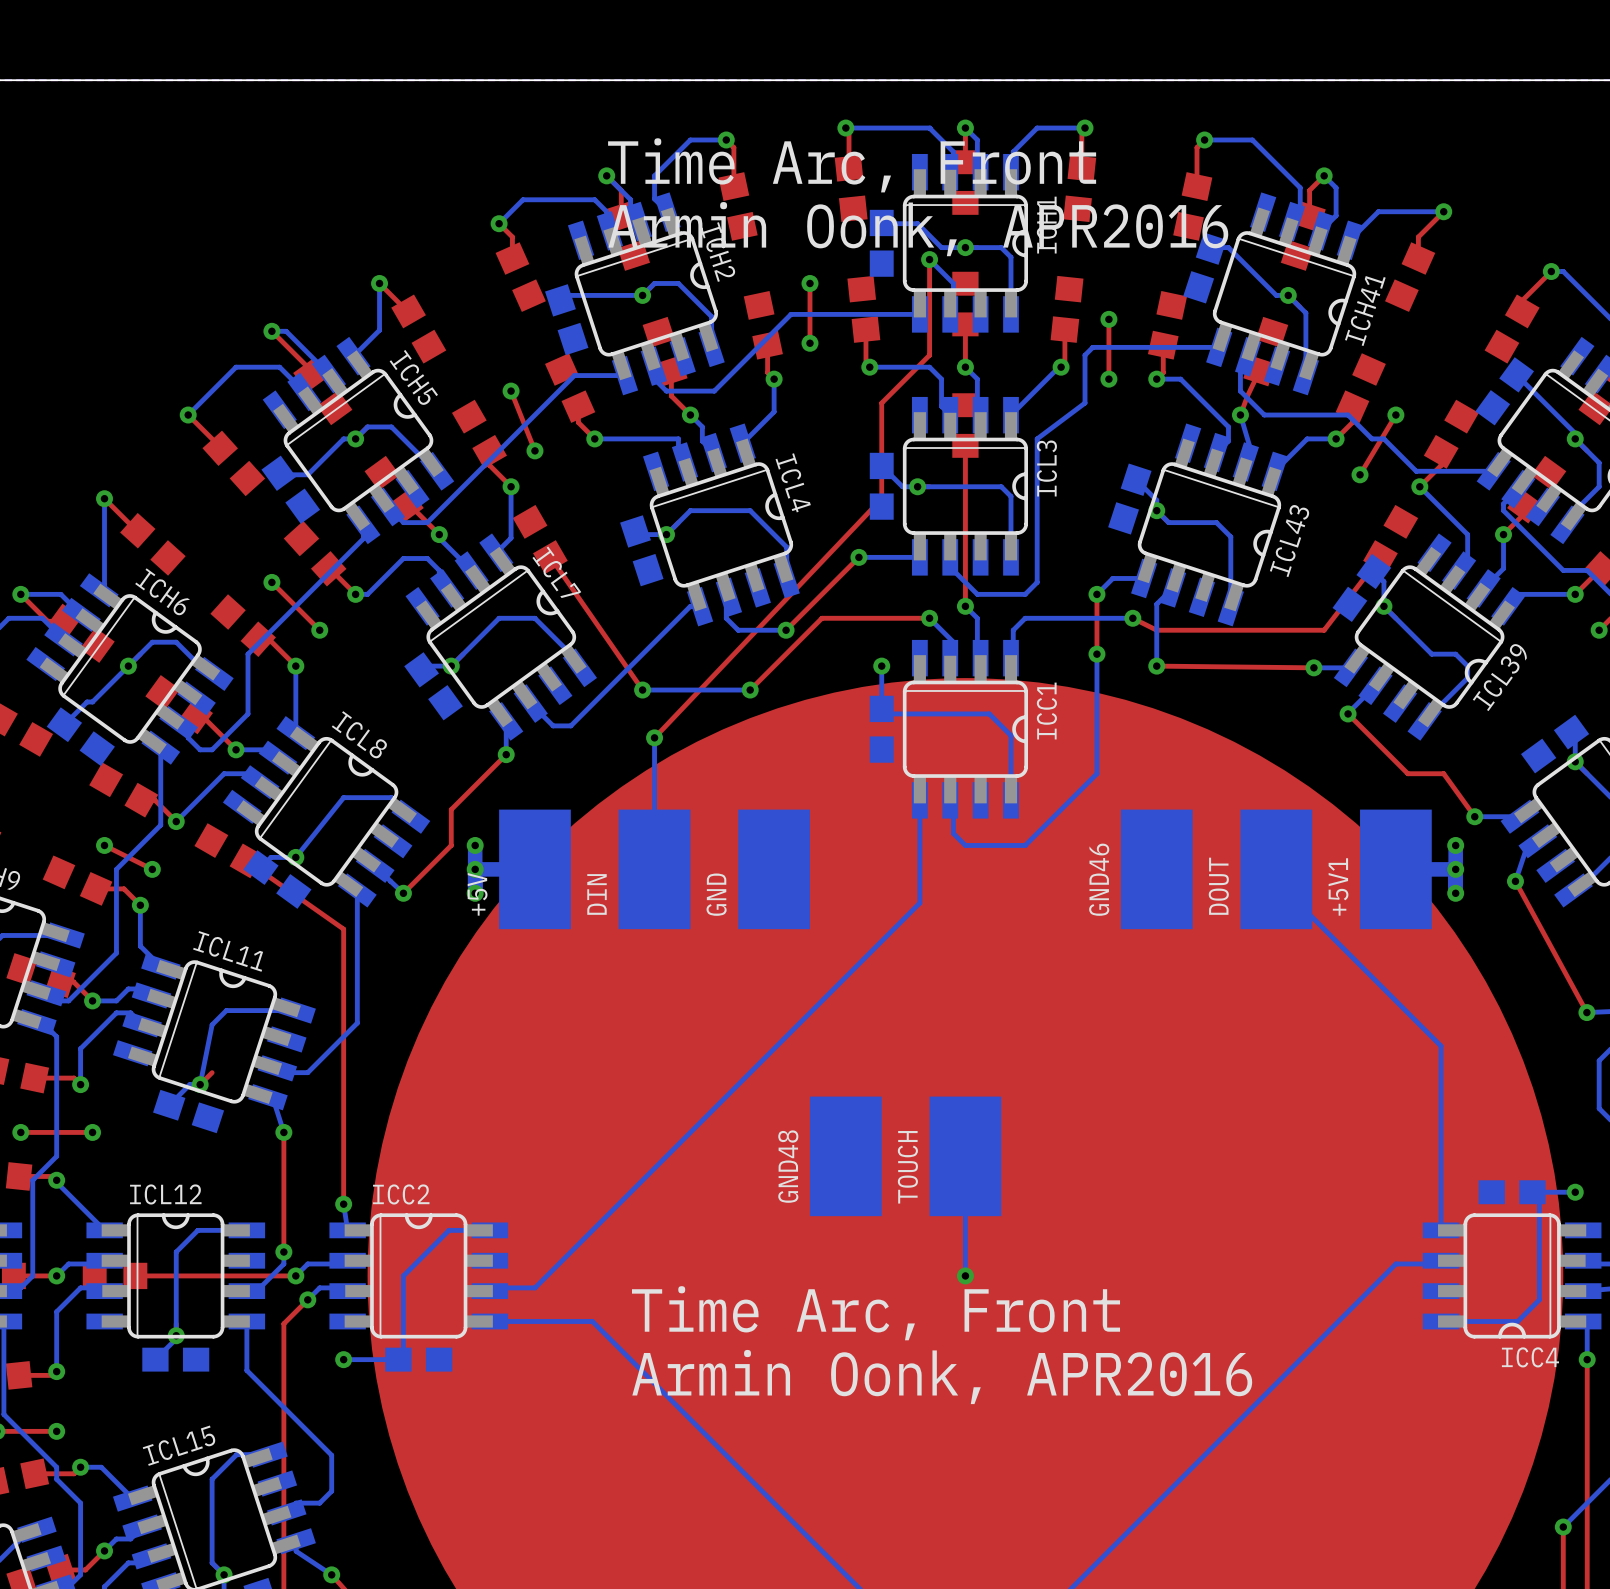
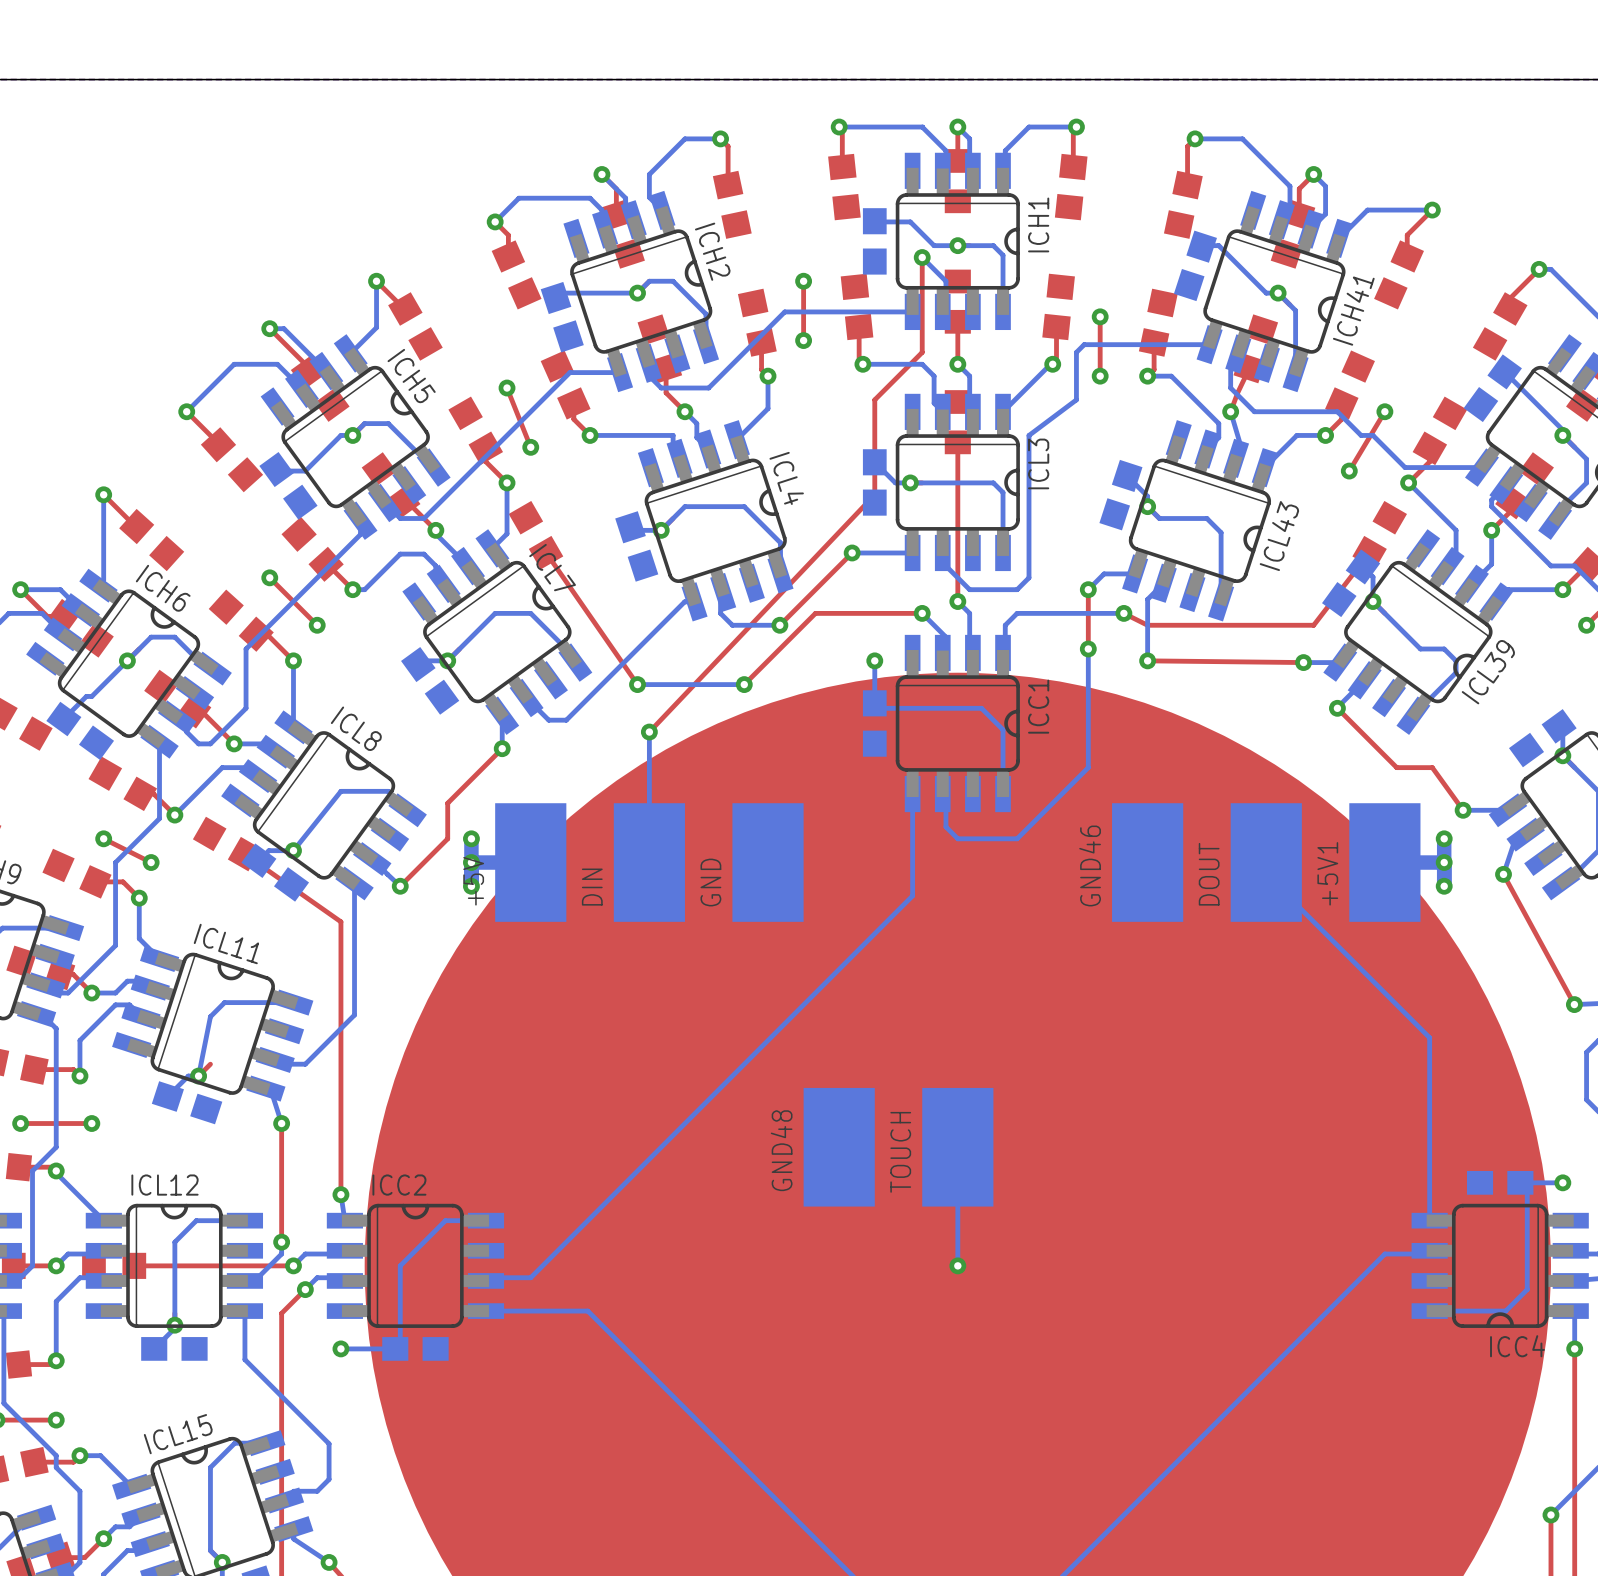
text: Time Arc, Front (852, 165) -> none
text: Armin Oonk, APR2016 (918, 229) -> none
text: Time Arc, Front (876, 1313) -> none
text: Armin Oonk, APR2016 (942, 1377) -> none

